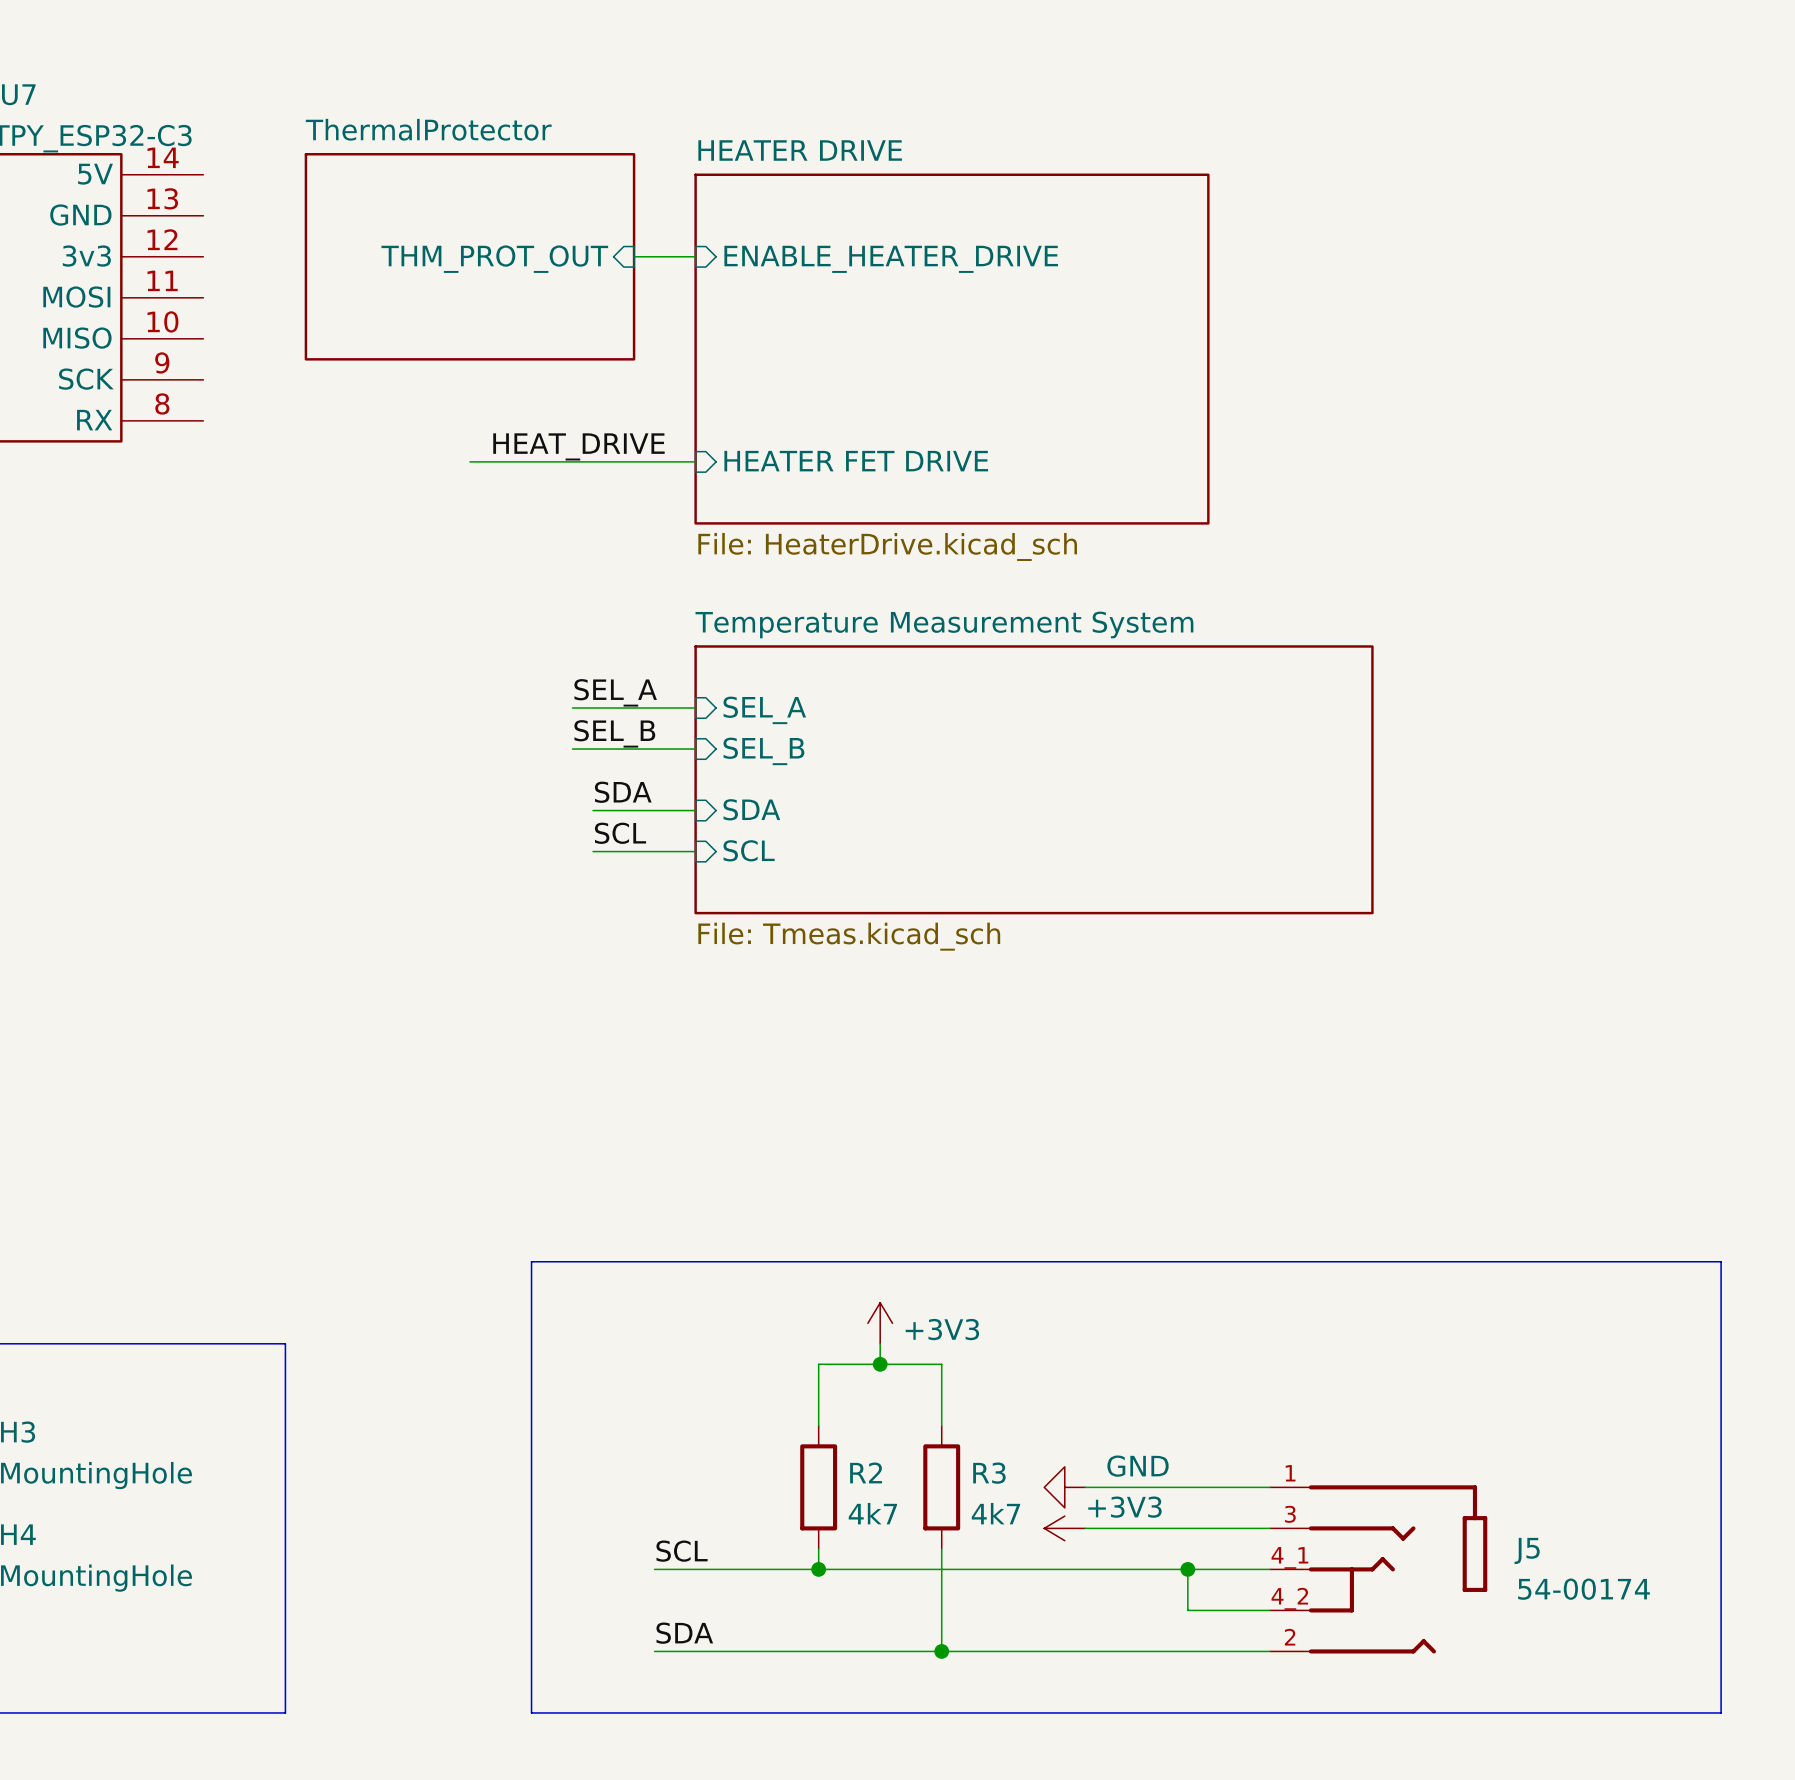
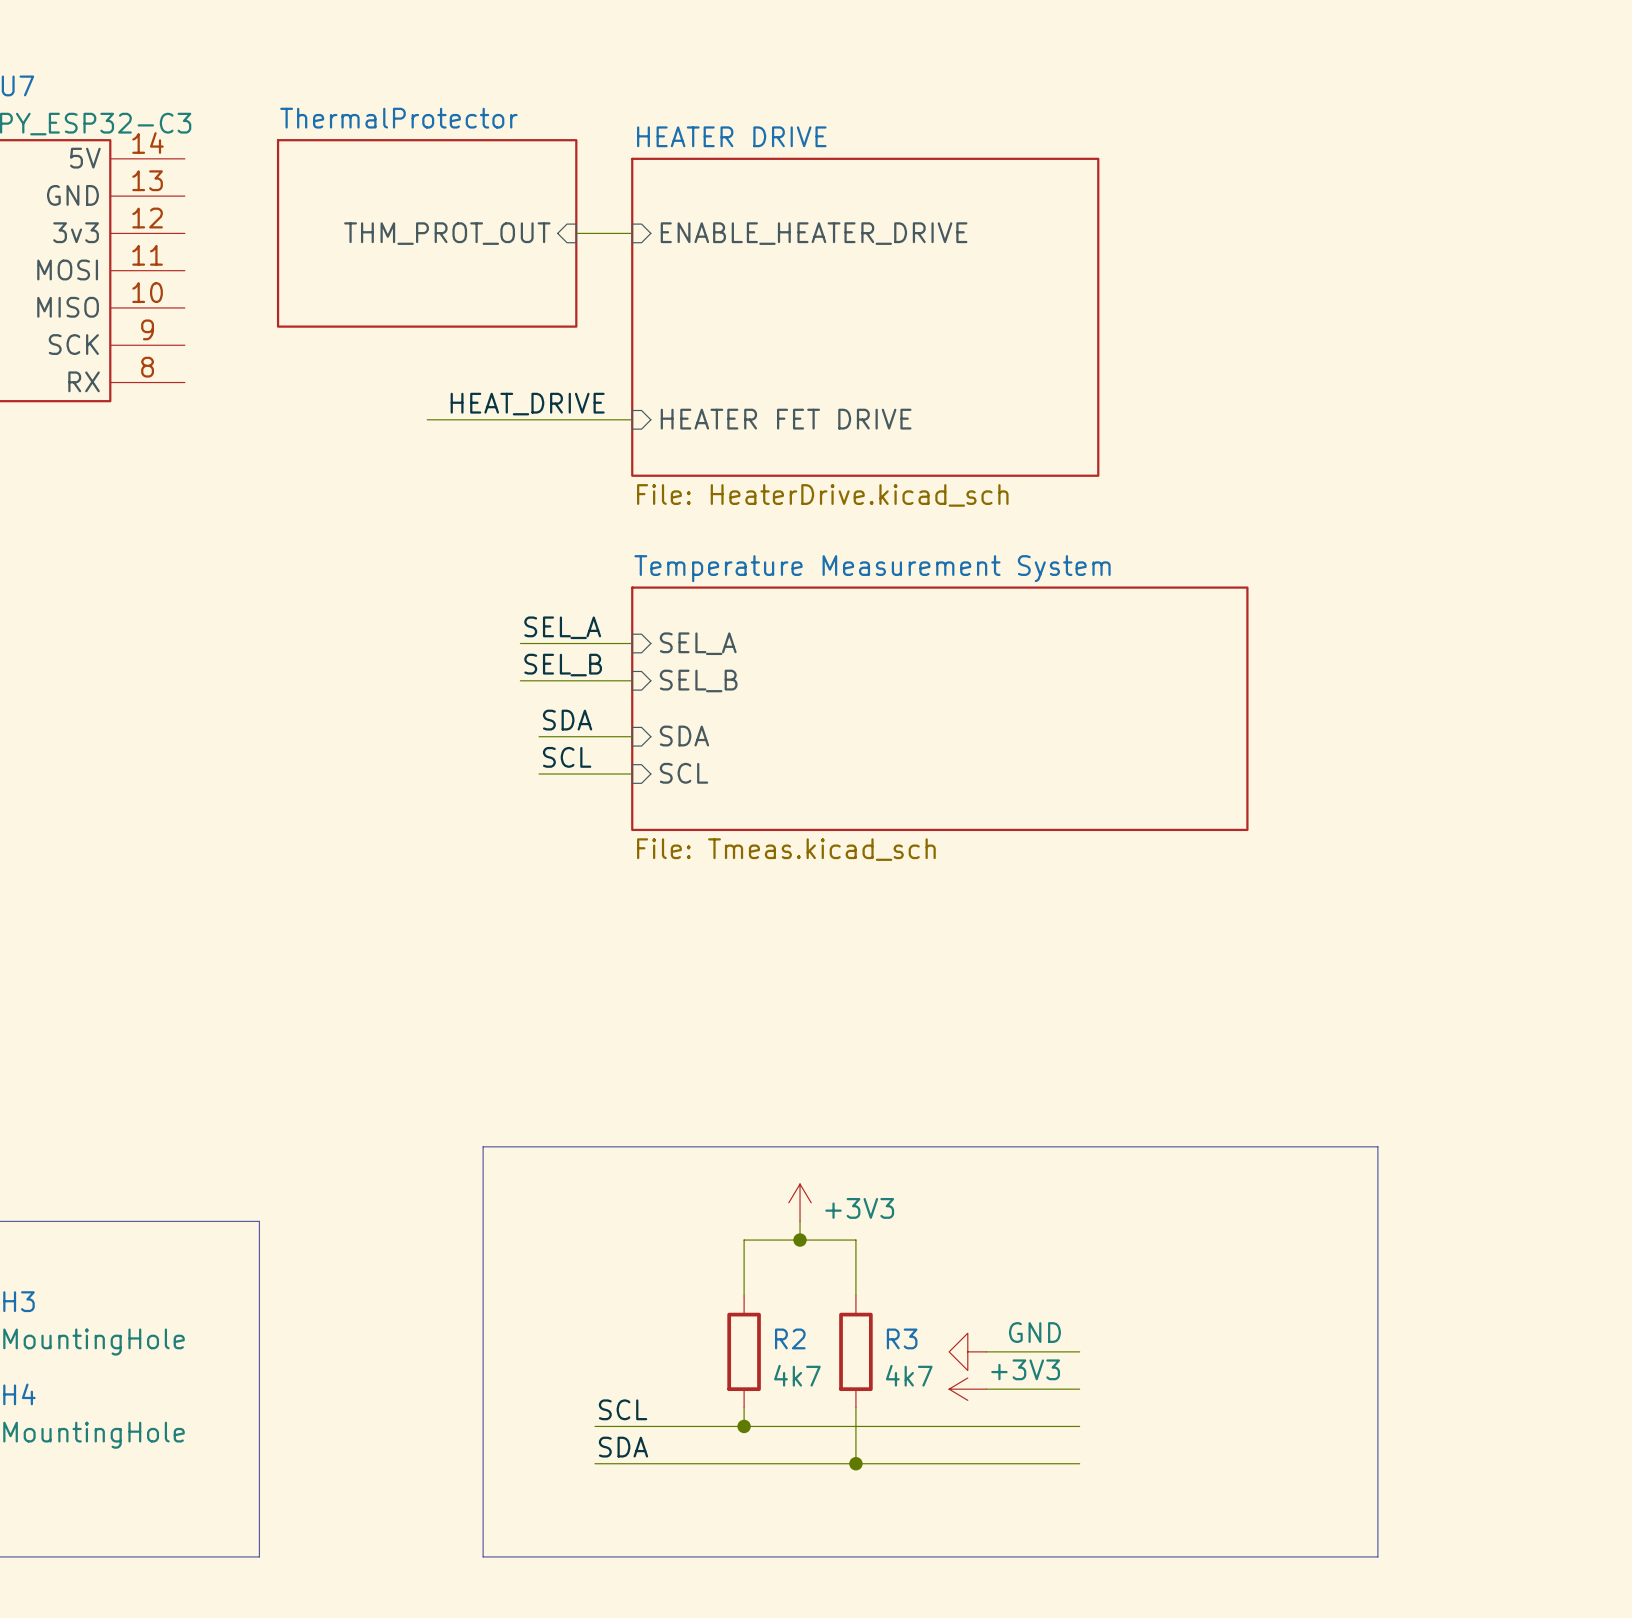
line: (1515, 1261) (1721, 1261) (1721, 1712) (1515, 1712) -> (1377, 1146) (1377, 1556)
wire: (1187, 1487) (1269, 1487) -> none
wire: (1187, 1528) (1269, 1528) -> none
junction: (1187, 1569) -> none
wire: (1269, 1569) (1187, 1569) (1187, 1610) (1269, 1610) -> none
J5: 54-00174 (1378, 1569) -> none
wire: none -> (594, 1463) (1079, 1463)
wire: (941, 1610) (941, 1651) -> none
label position: SDA (684, 1633) -> SDA (623, 1447)
wire: (654, 1651) (1269, 1651) -> none
junction position: (941, 1651) -> (855, 1463)

